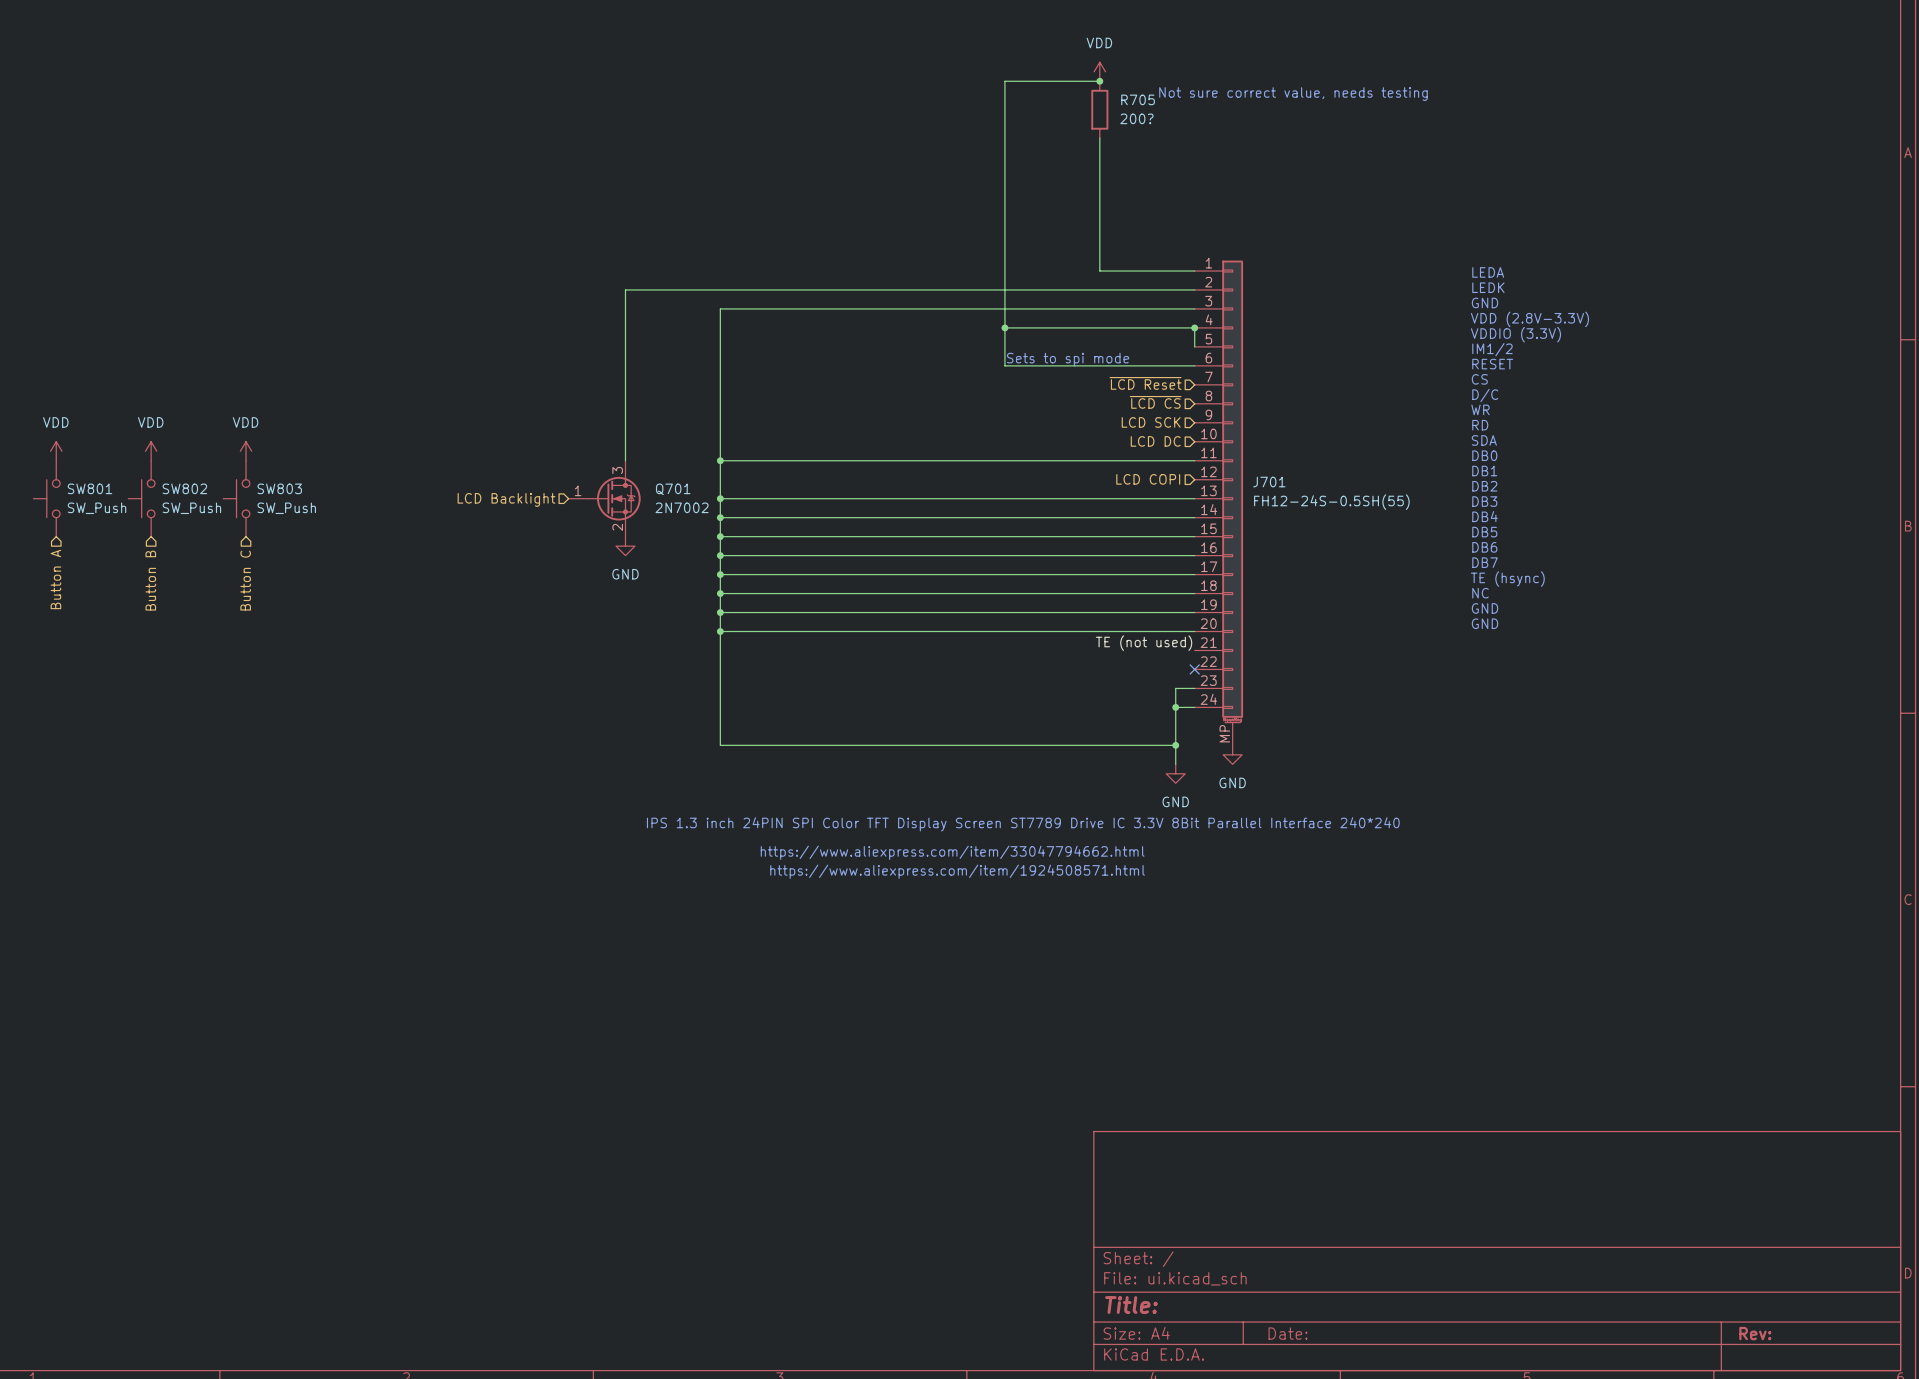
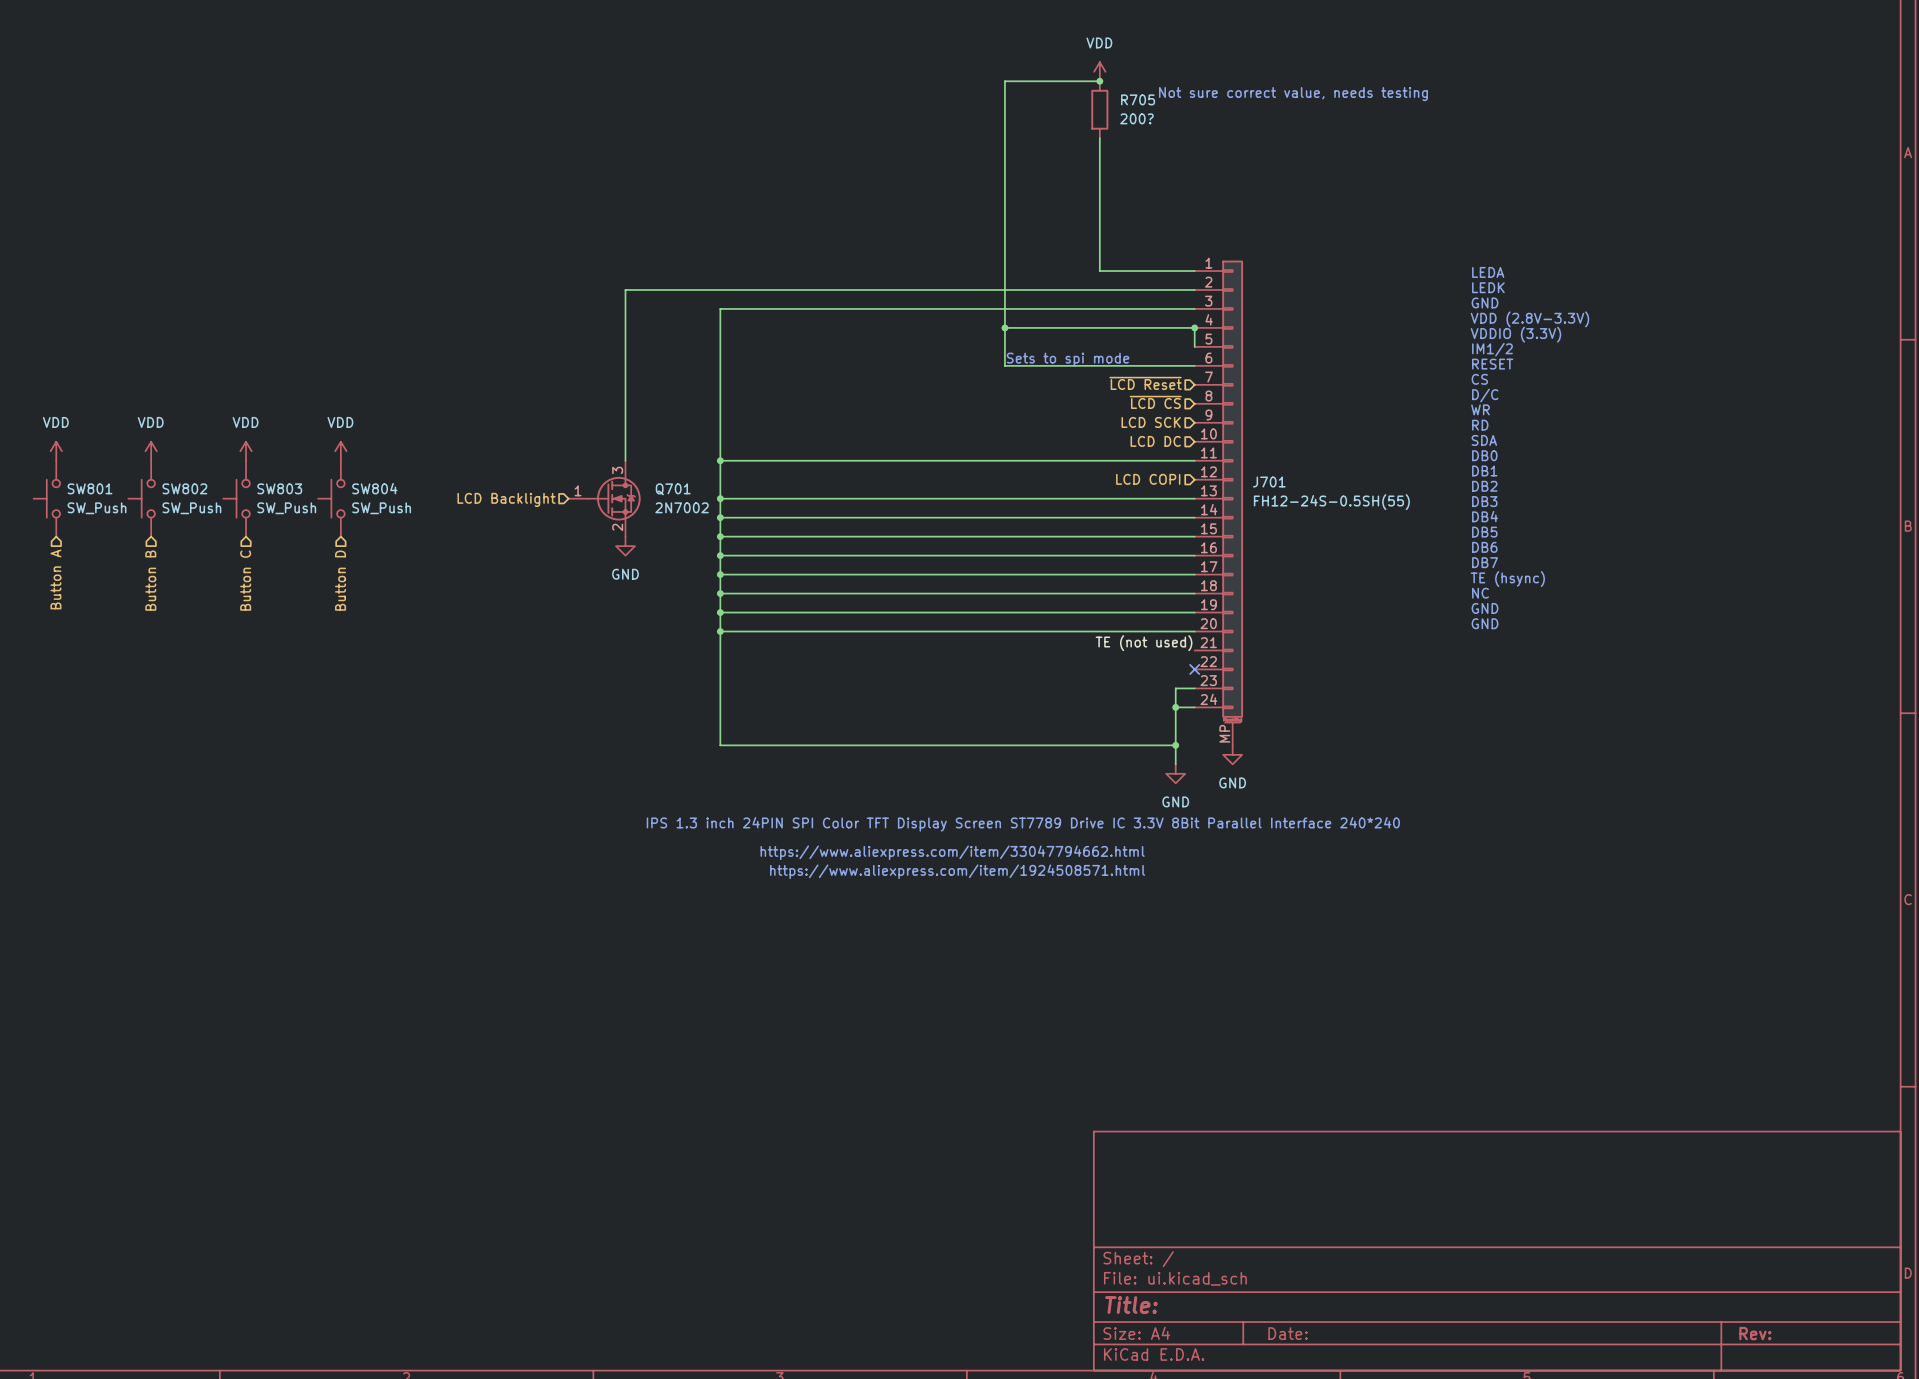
power symbol: none -> VDD (340, 451)
SW804: none -> SW_Push (331, 498)
hierarchical label: none -> Button D (340, 580)

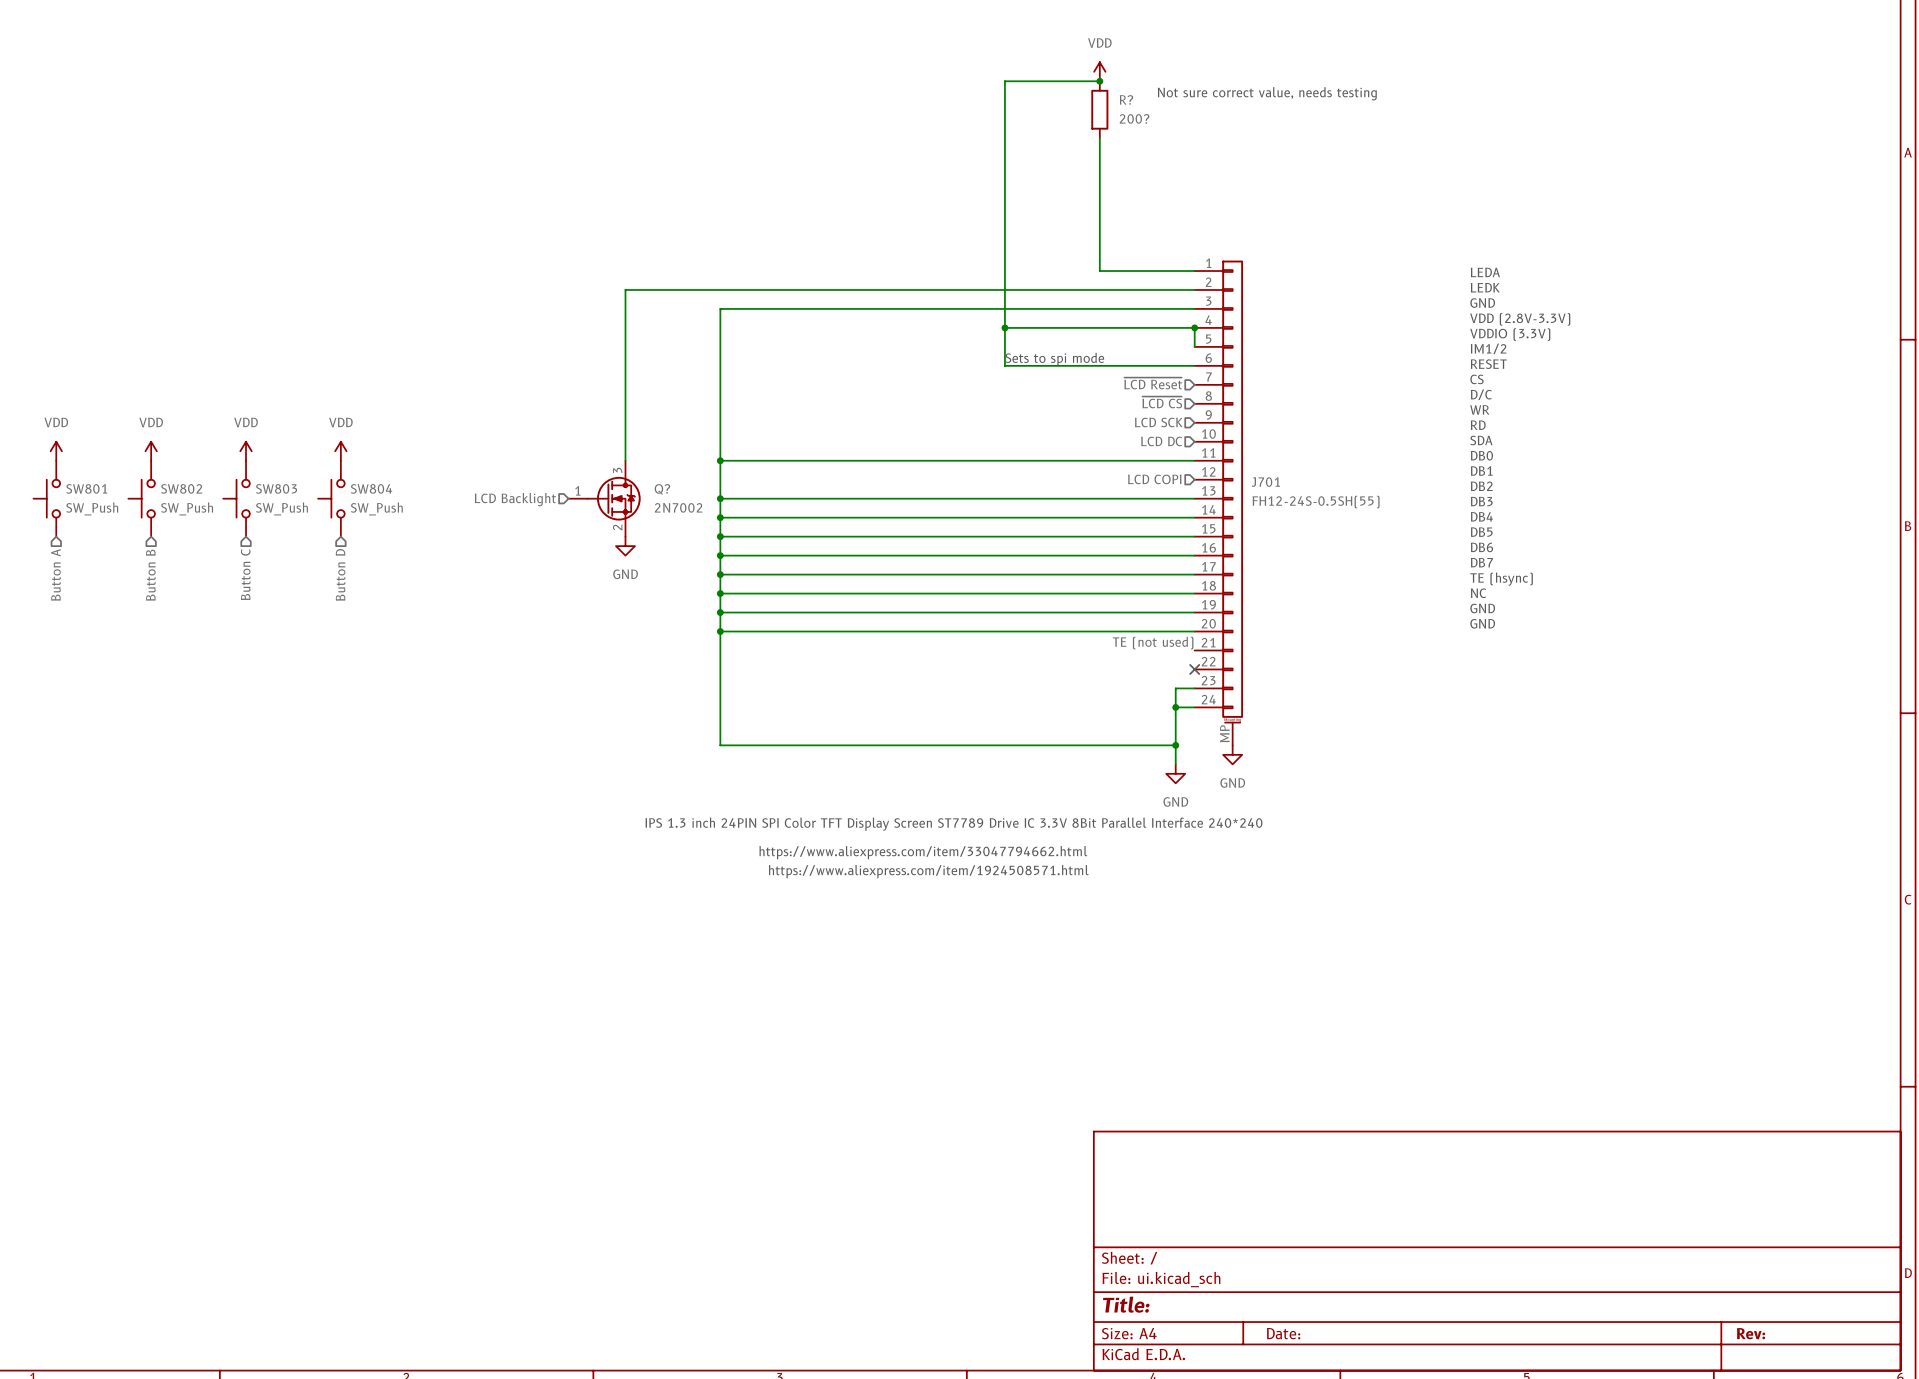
R705 name: R705 (1138, 99) -> R? (1126, 99)
Q701 name: Q701 (673, 489) -> Q? (662, 489)

